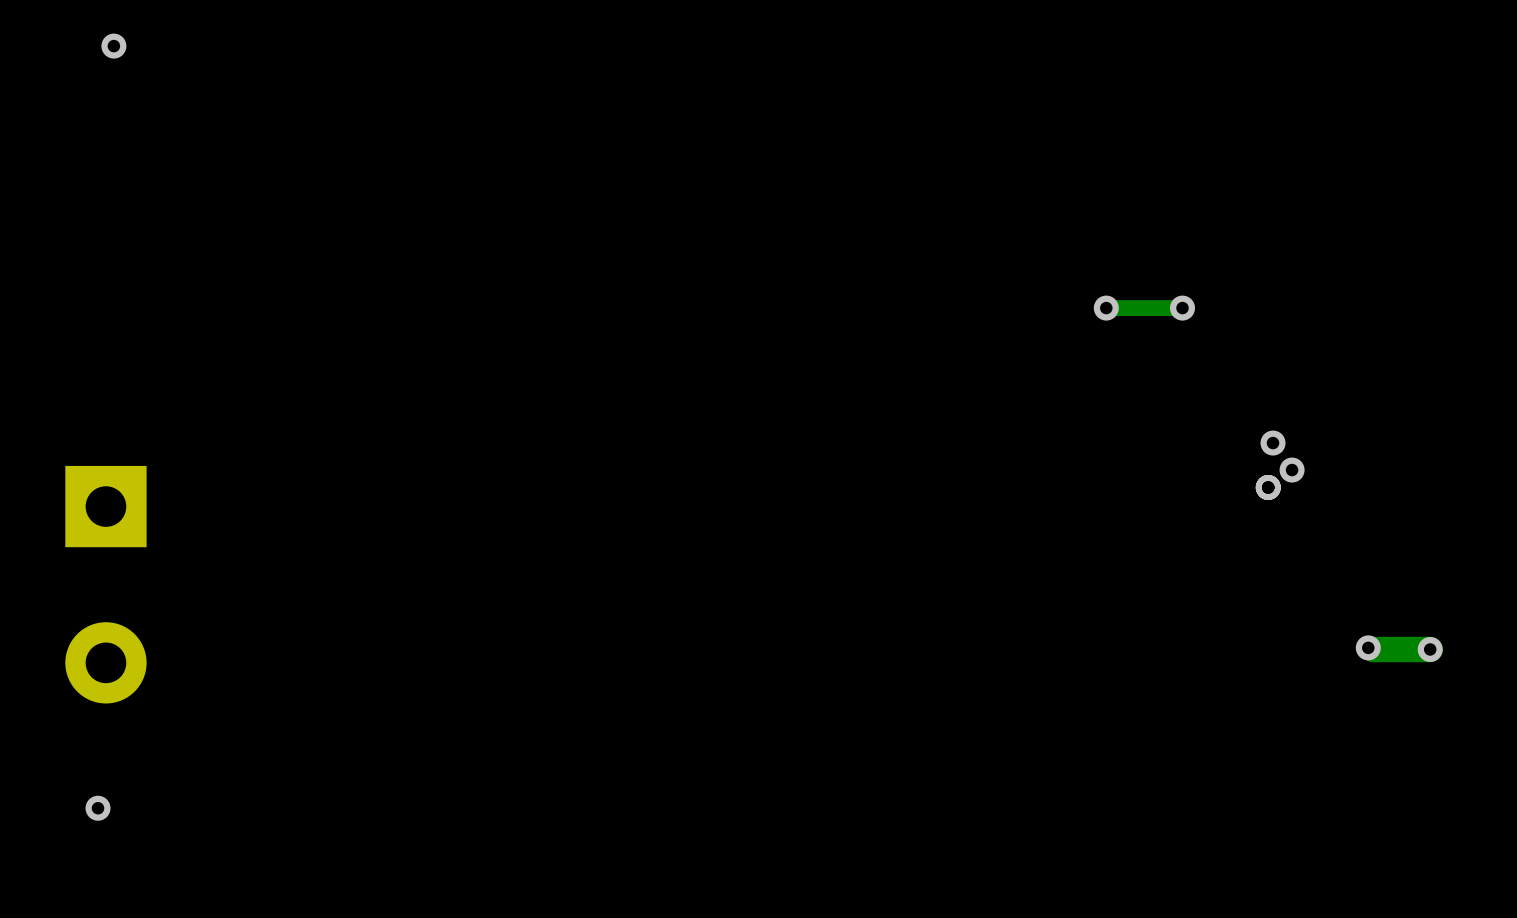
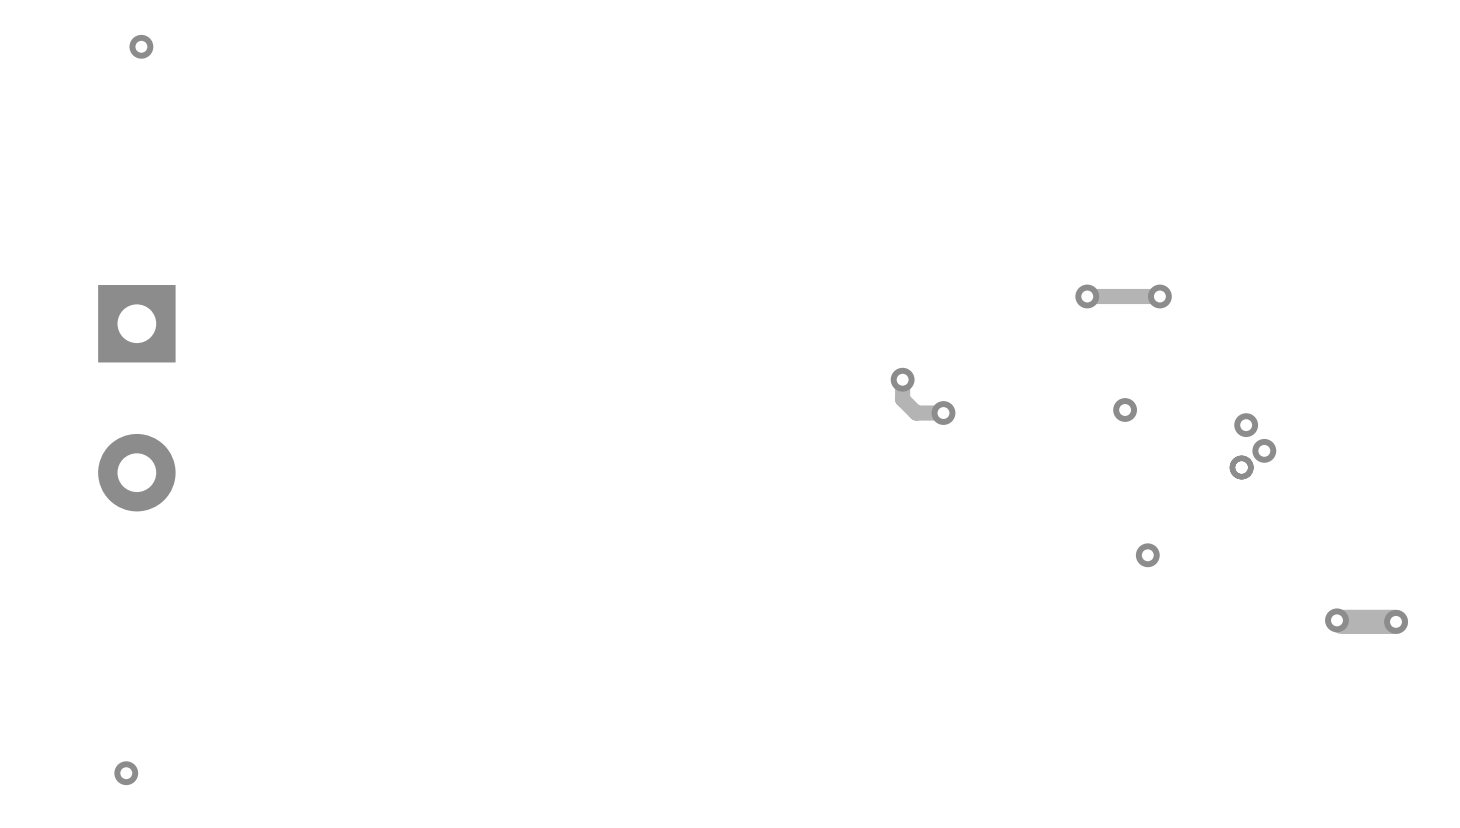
track: none -> (902, 379) (902, 399) (916, 413) (943, 413)
via: none -> (902, 379)
via: none -> (1125, 410)
via: none -> (943, 413)
via: none -> (1147, 555)
part position: (105, 584) -> (136, 398)

